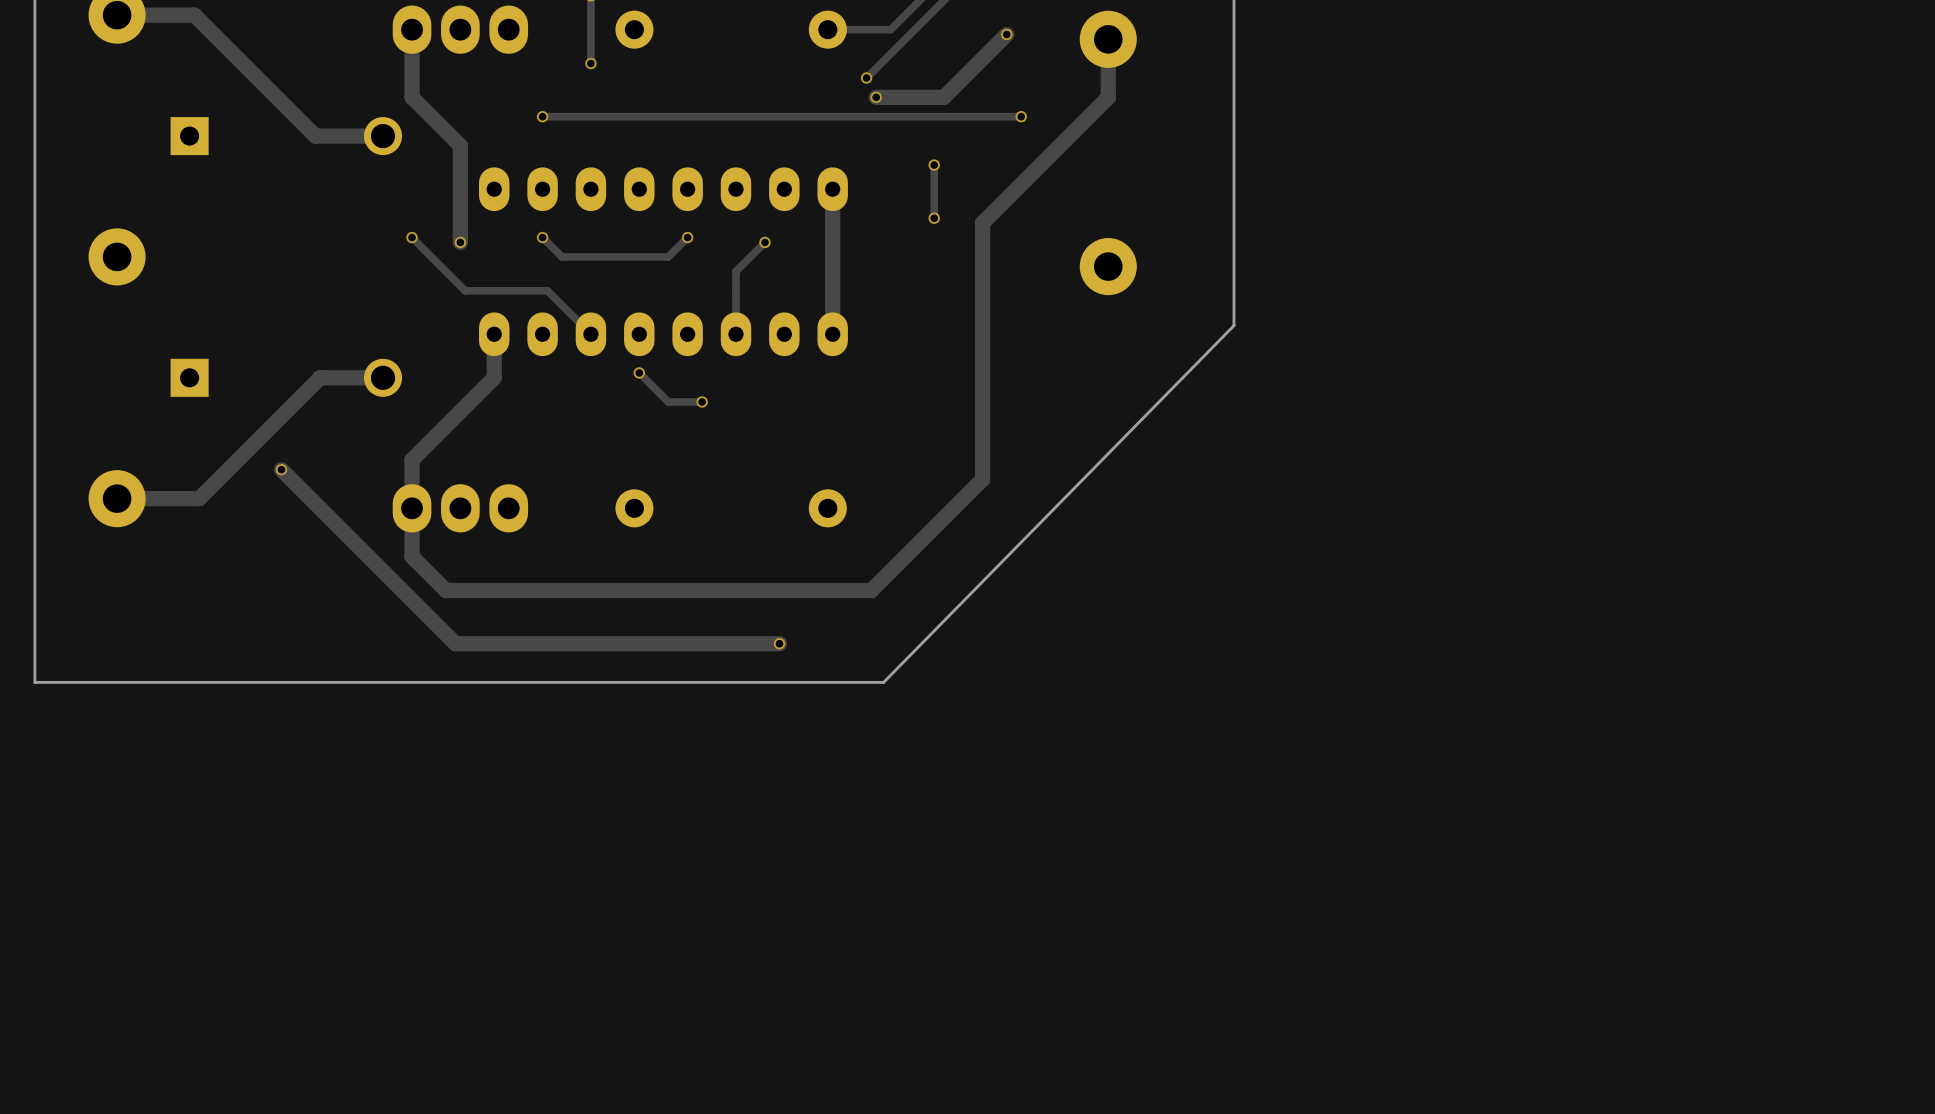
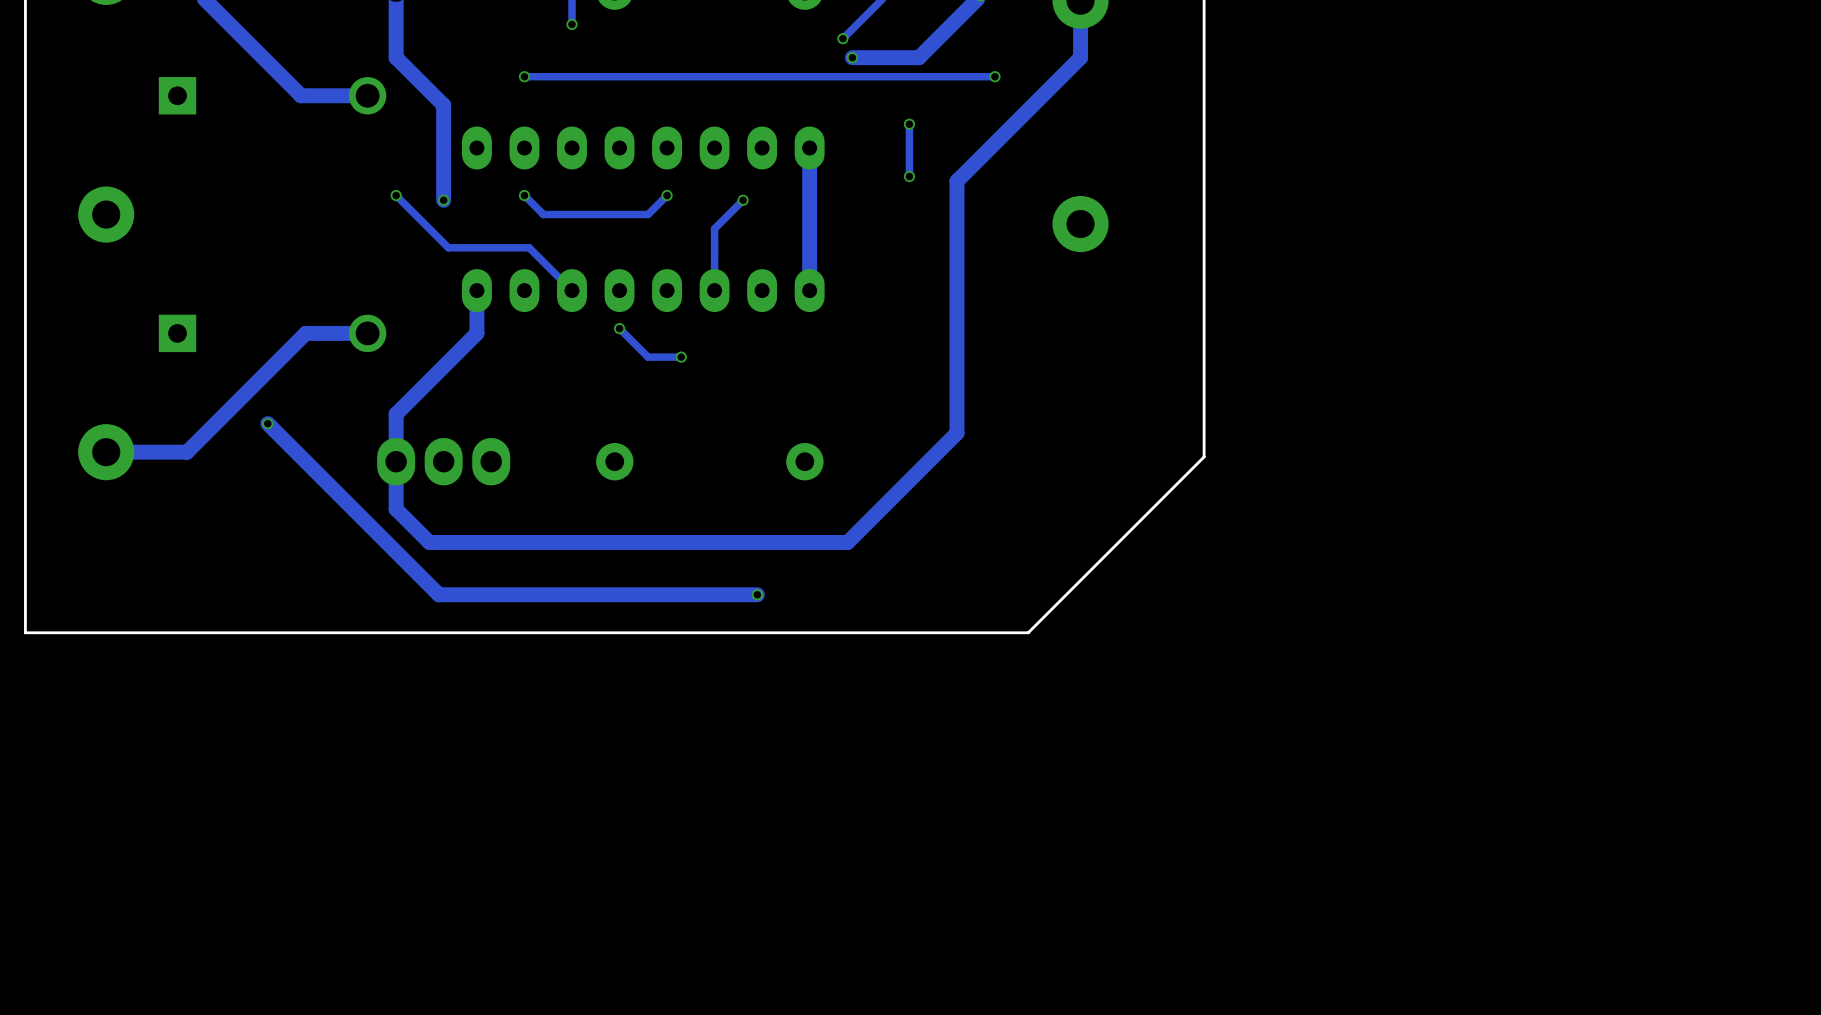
board edge: (1233, 325) (883, 682) -> (1204, 282) (1204, 456) (1028, 632) (859, 632)

